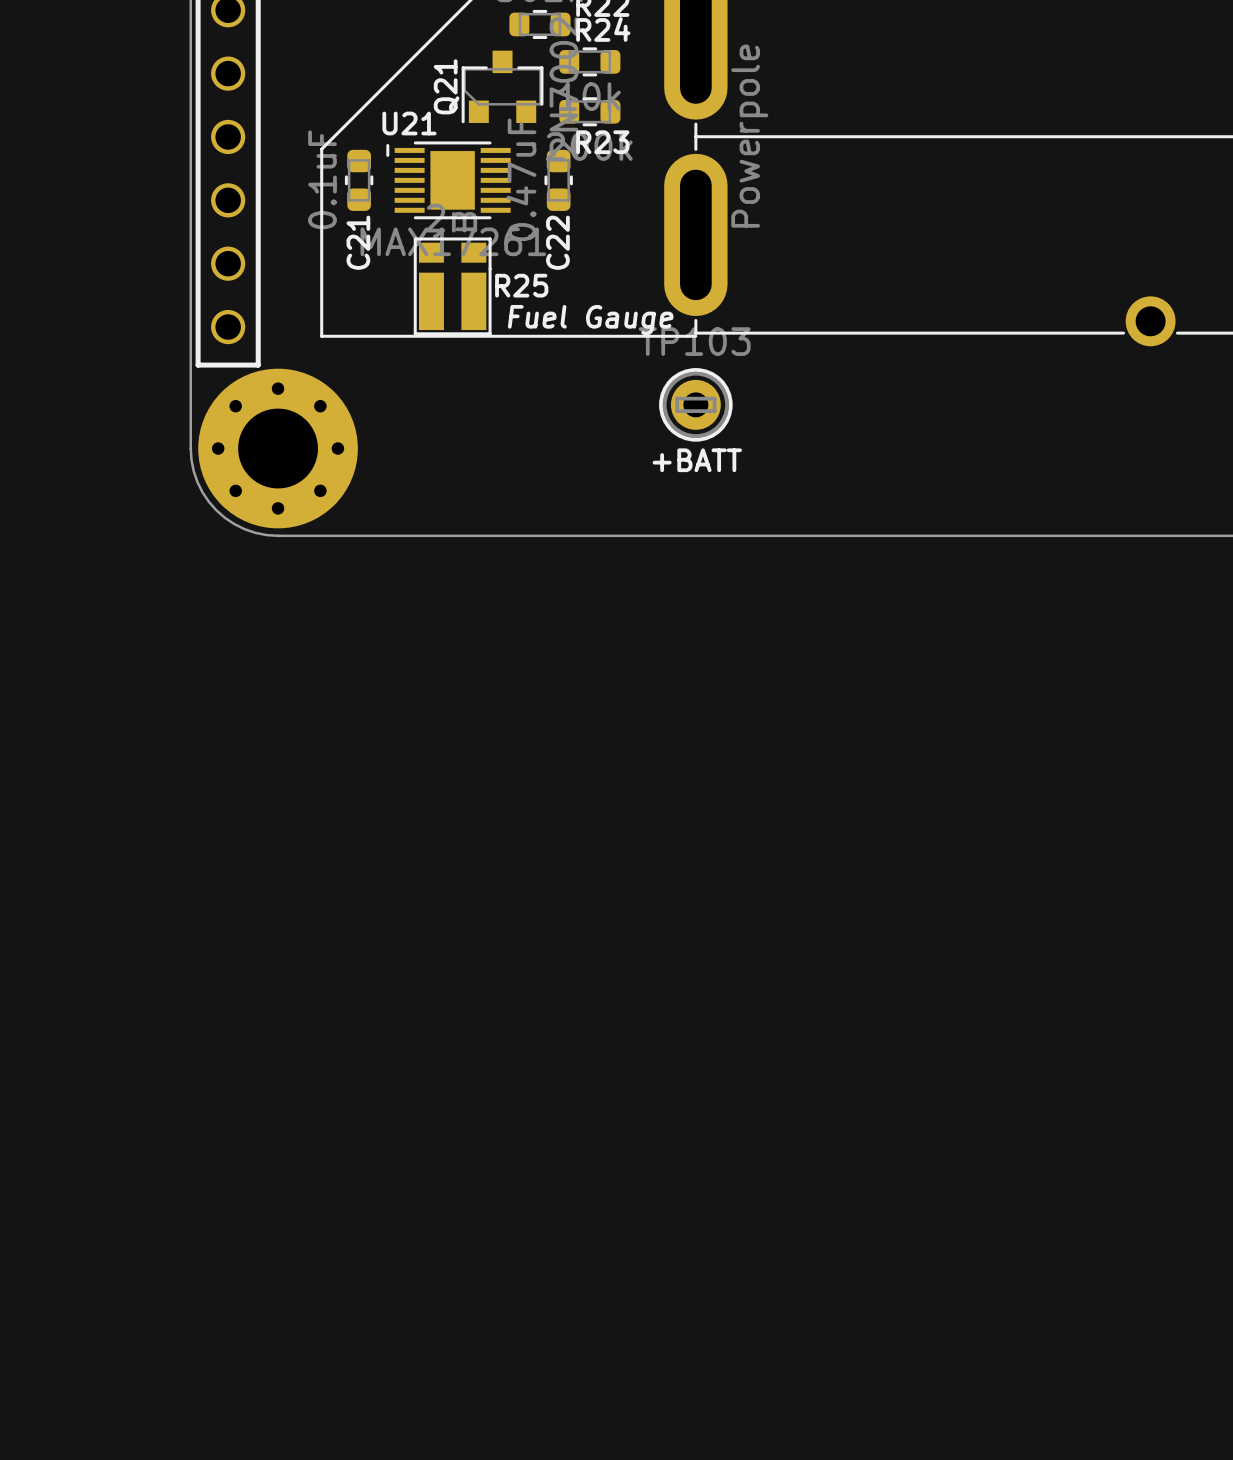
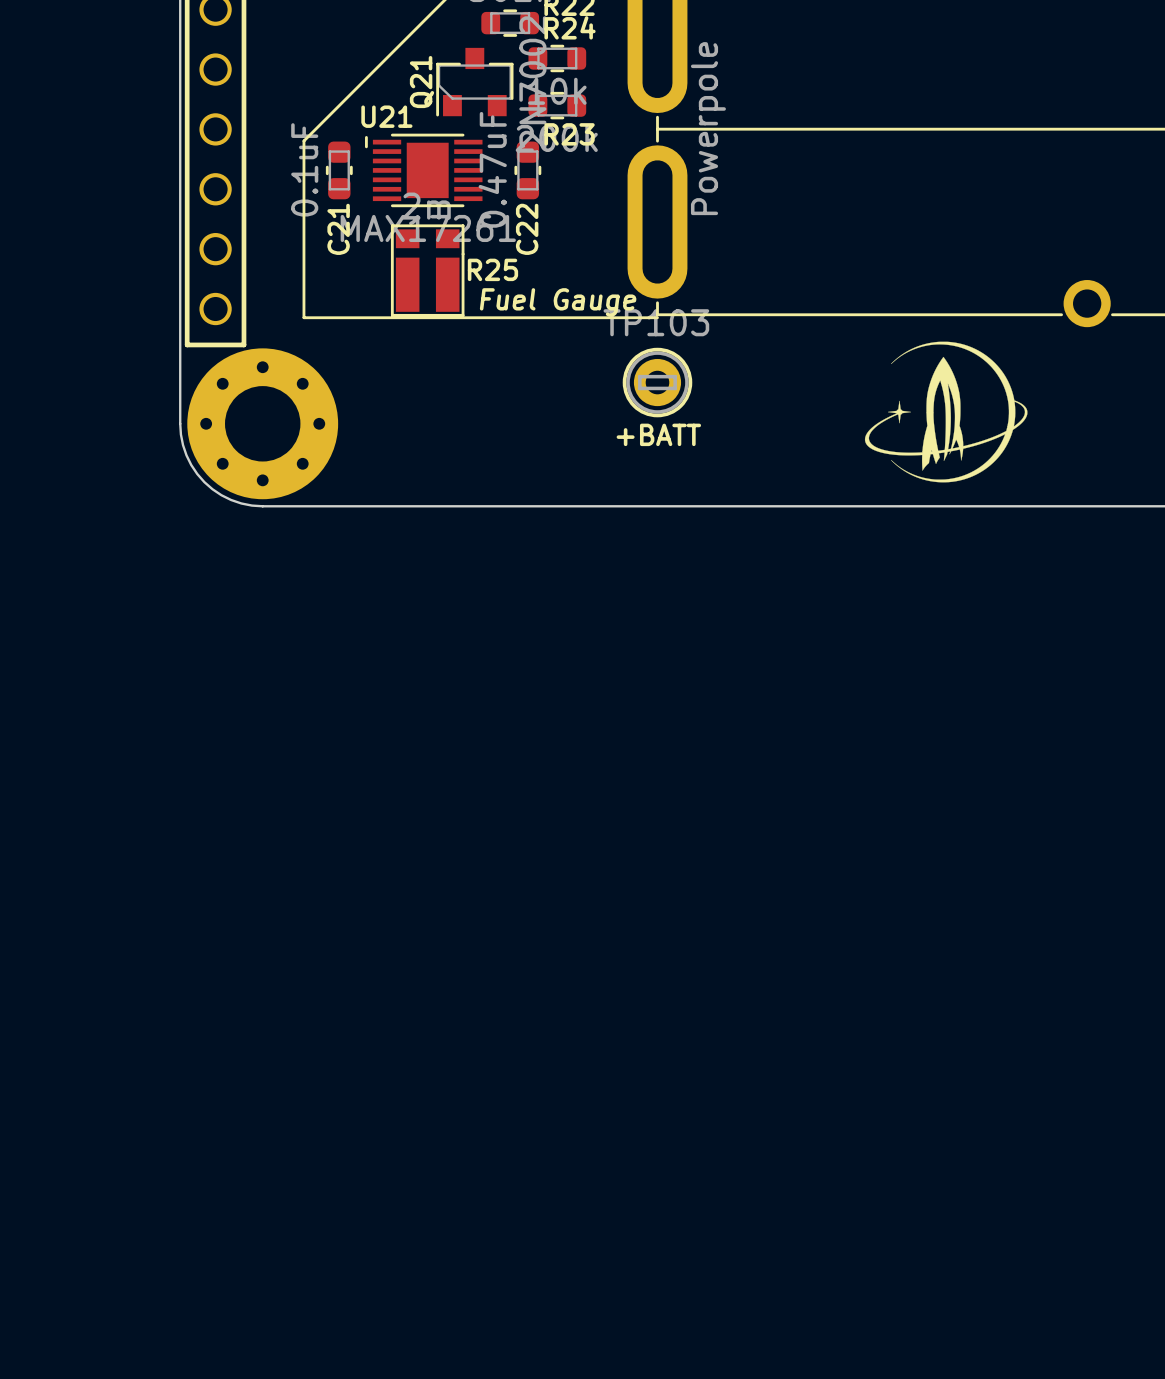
drawing: none -> [864, 341, 1028, 483]

